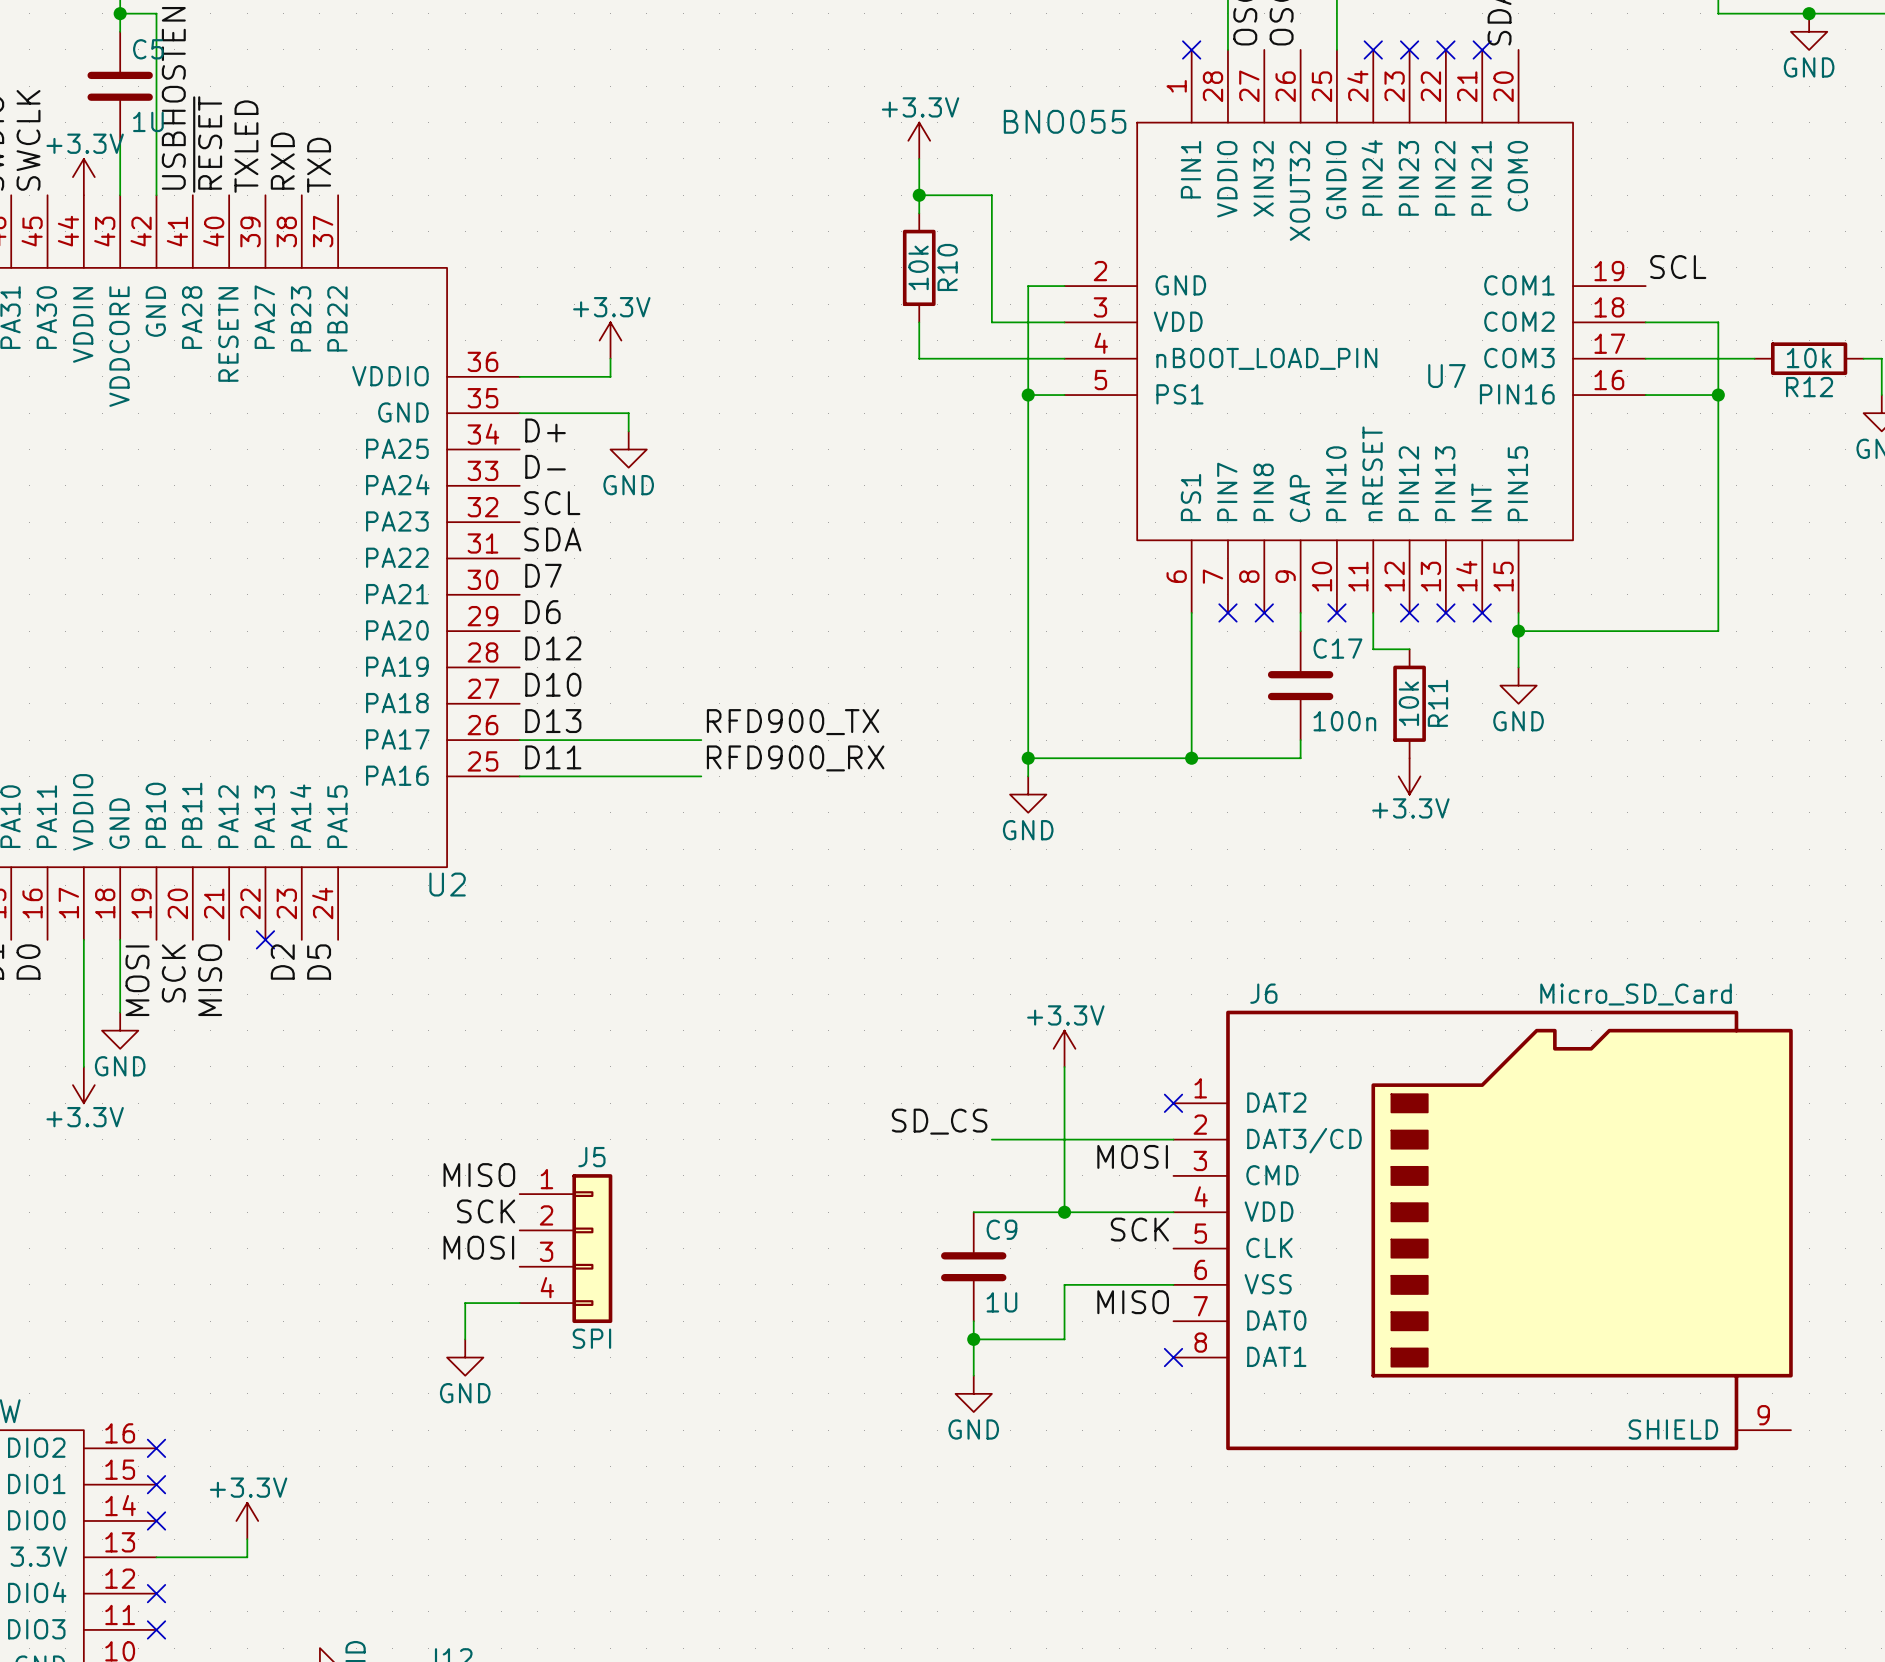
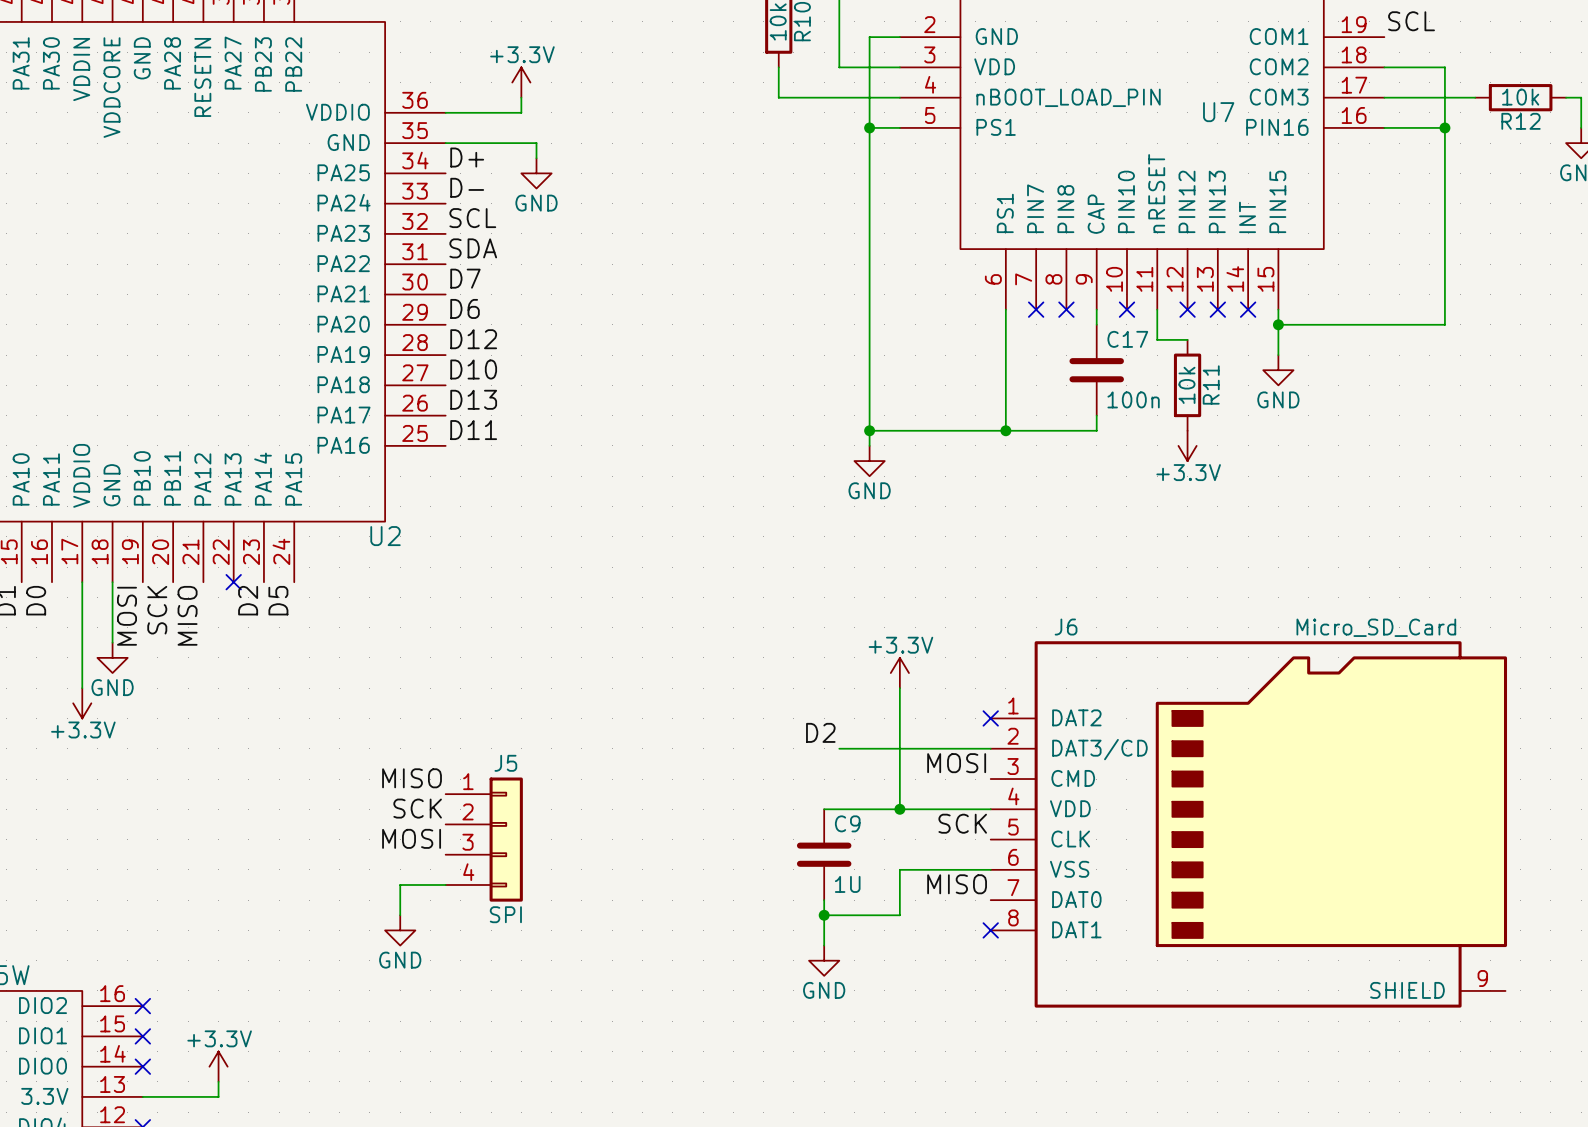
label: RFD900_TX (793, 722) -> none
wire: (519, 740) (701, 740) -> none
label: RFD900_RX (795, 758) -> none
wire: (519, 776) (701, 776) -> none
label: SD_CS (939, 1121) -> D2 (820, 732)

